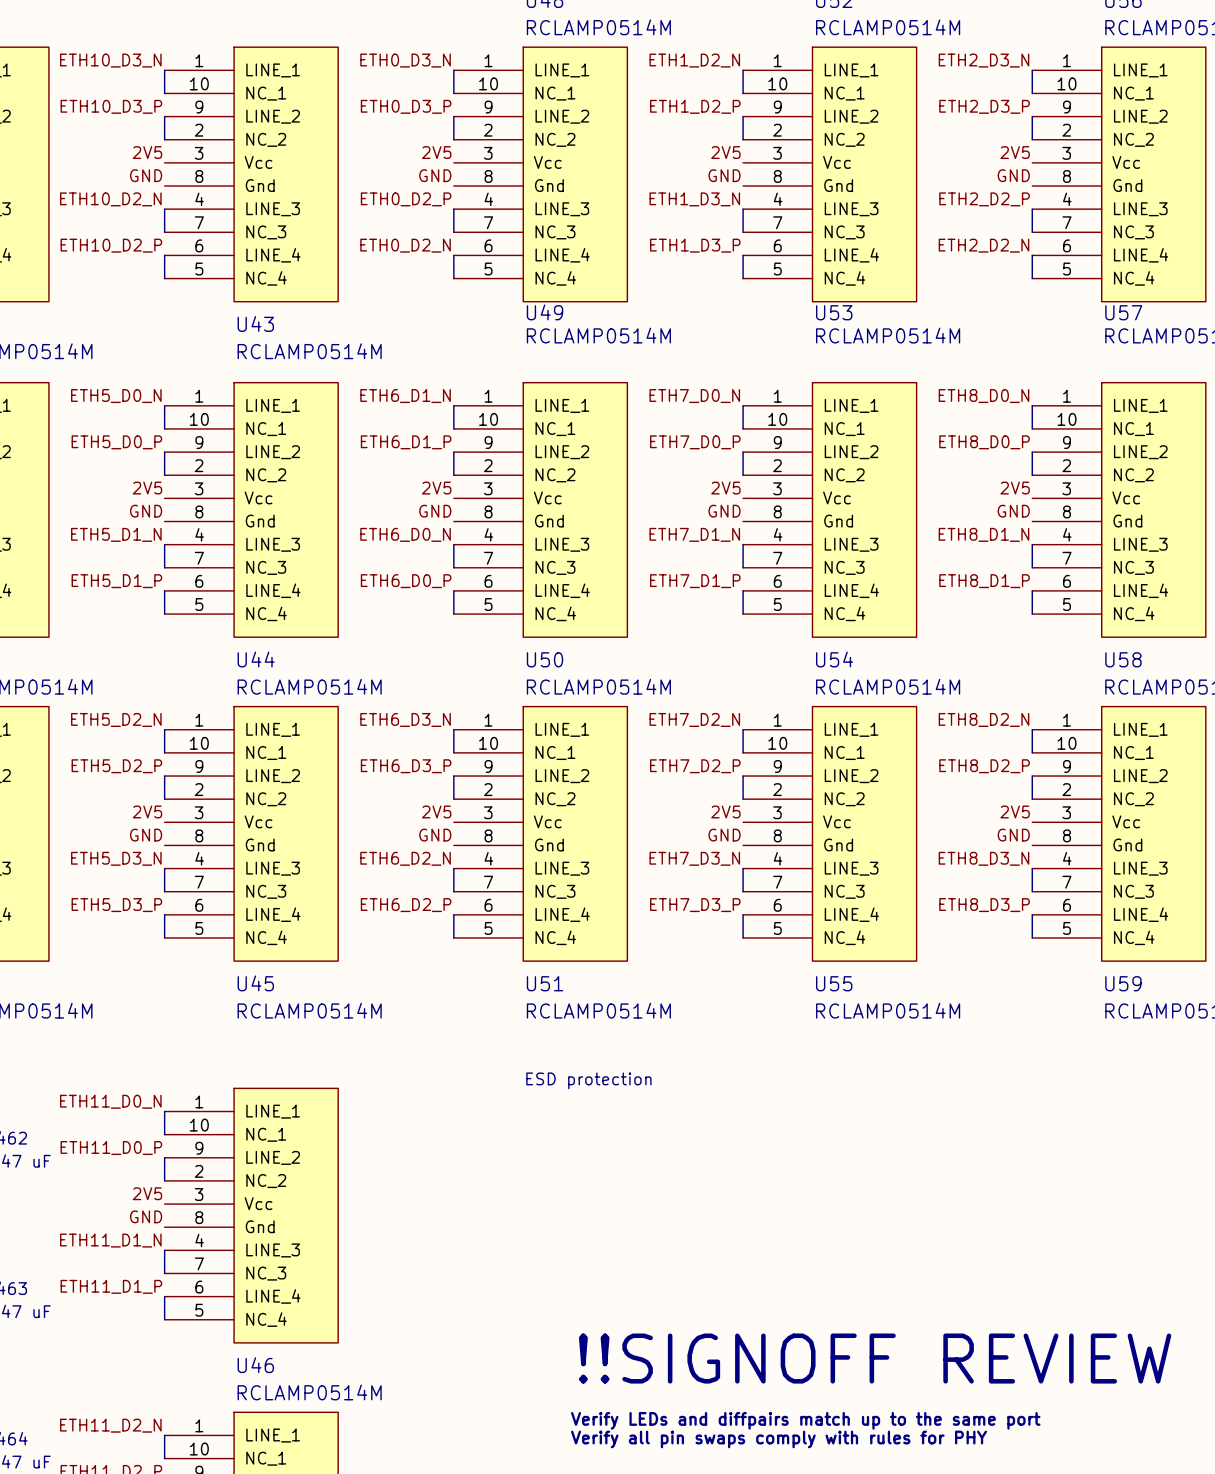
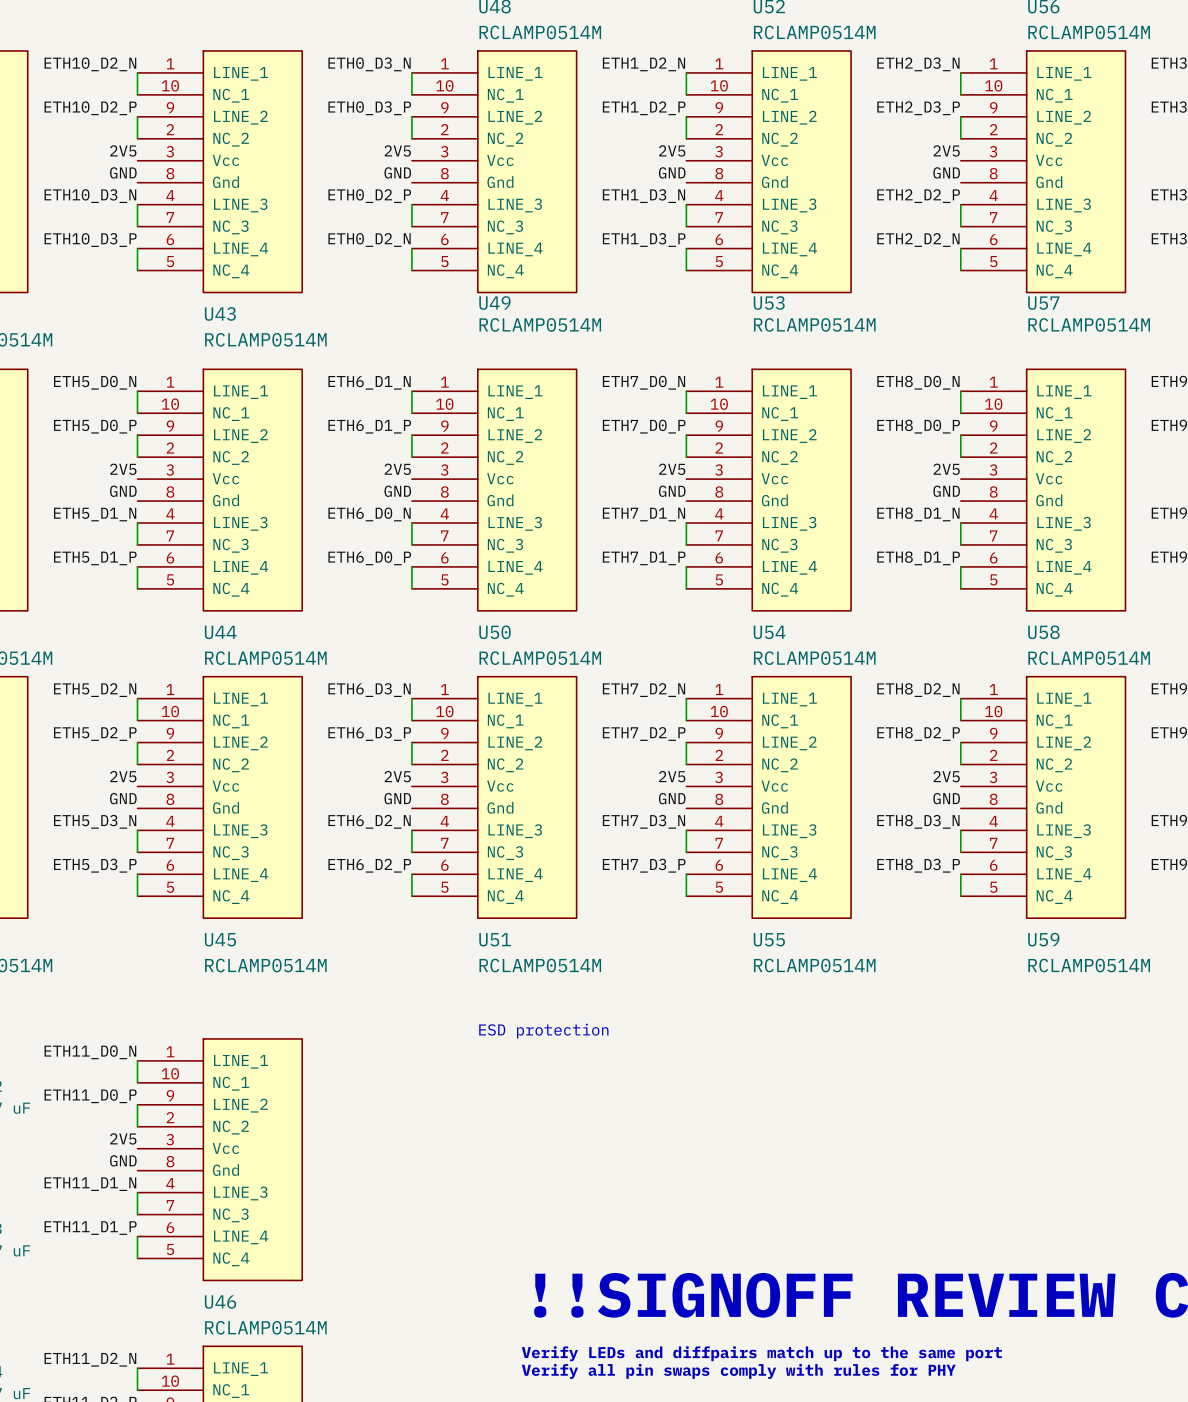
label: ETH10_D3_N (110, 60) -> ETH10_D2_N (90, 64)
label: ETH10_D3_P (111, 106) -> ETH10_D2_P (90, 108)
label: ETH10_D2_N (110, 199) -> ETH10_D3_N (90, 196)
label: ETH10_D2_P (111, 245) -> ETH10_D3_P (90, 240)

